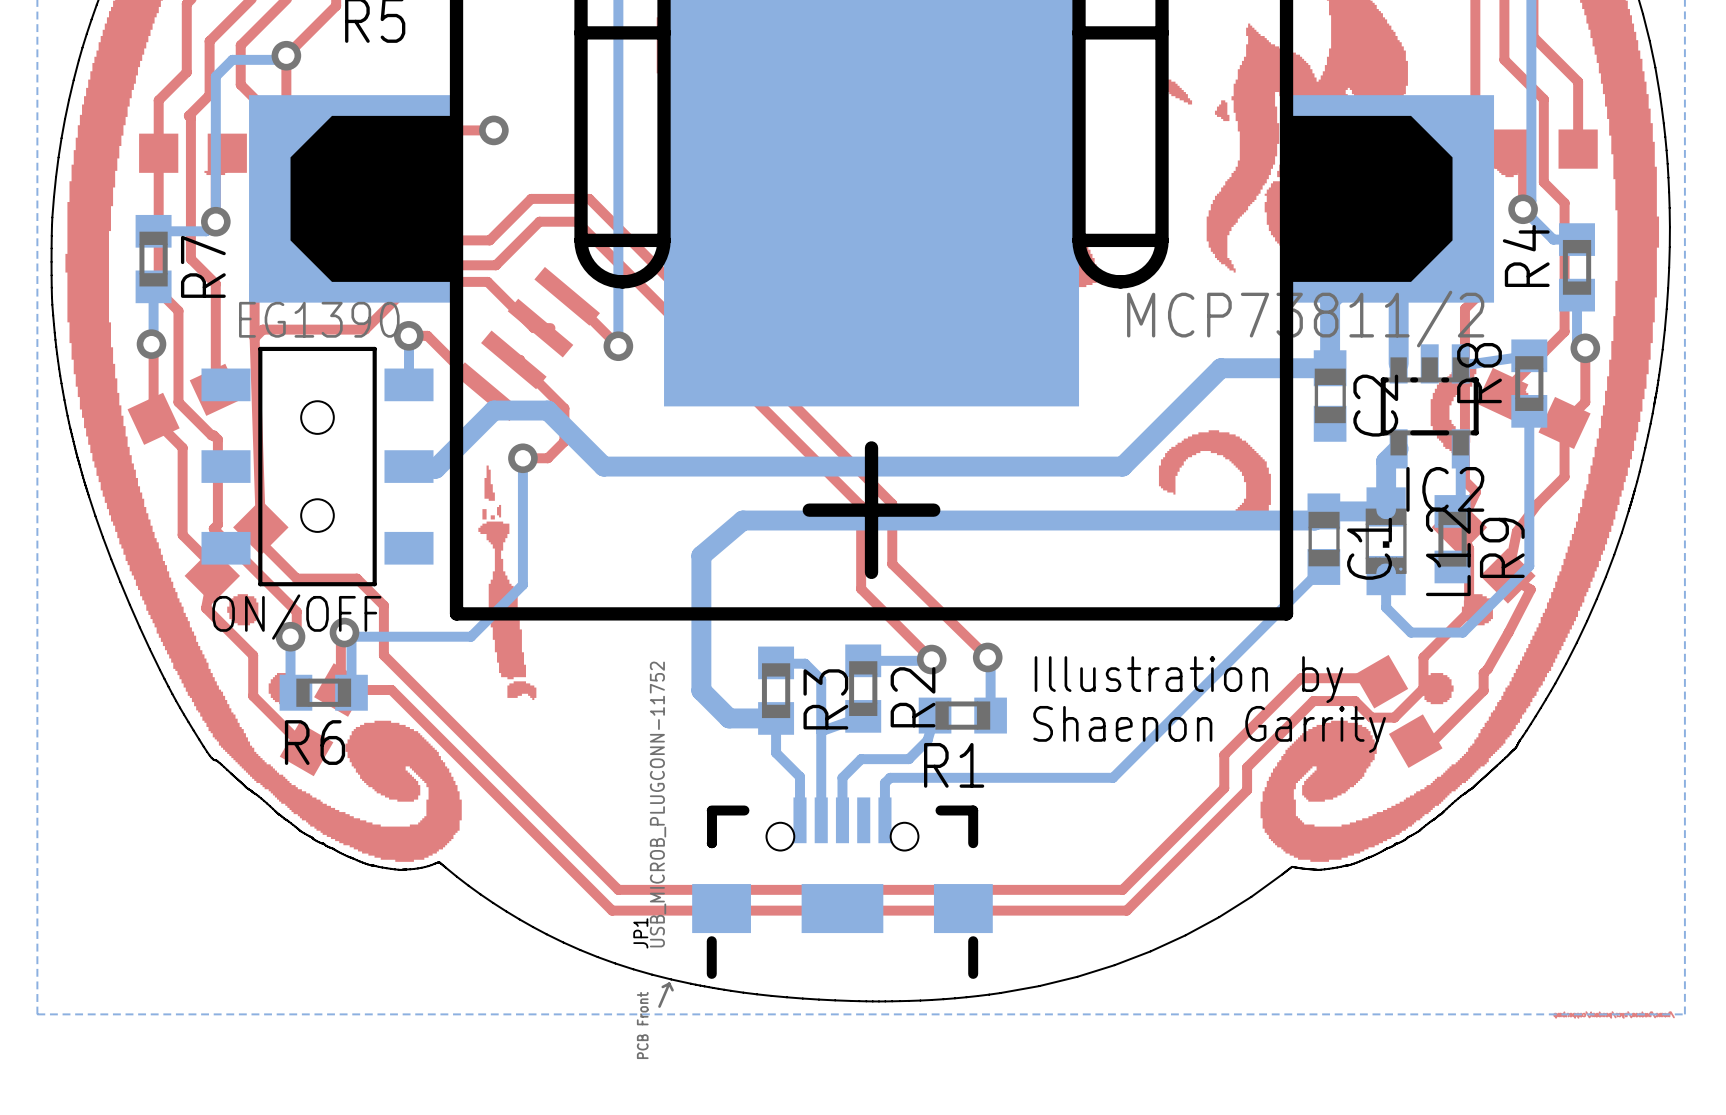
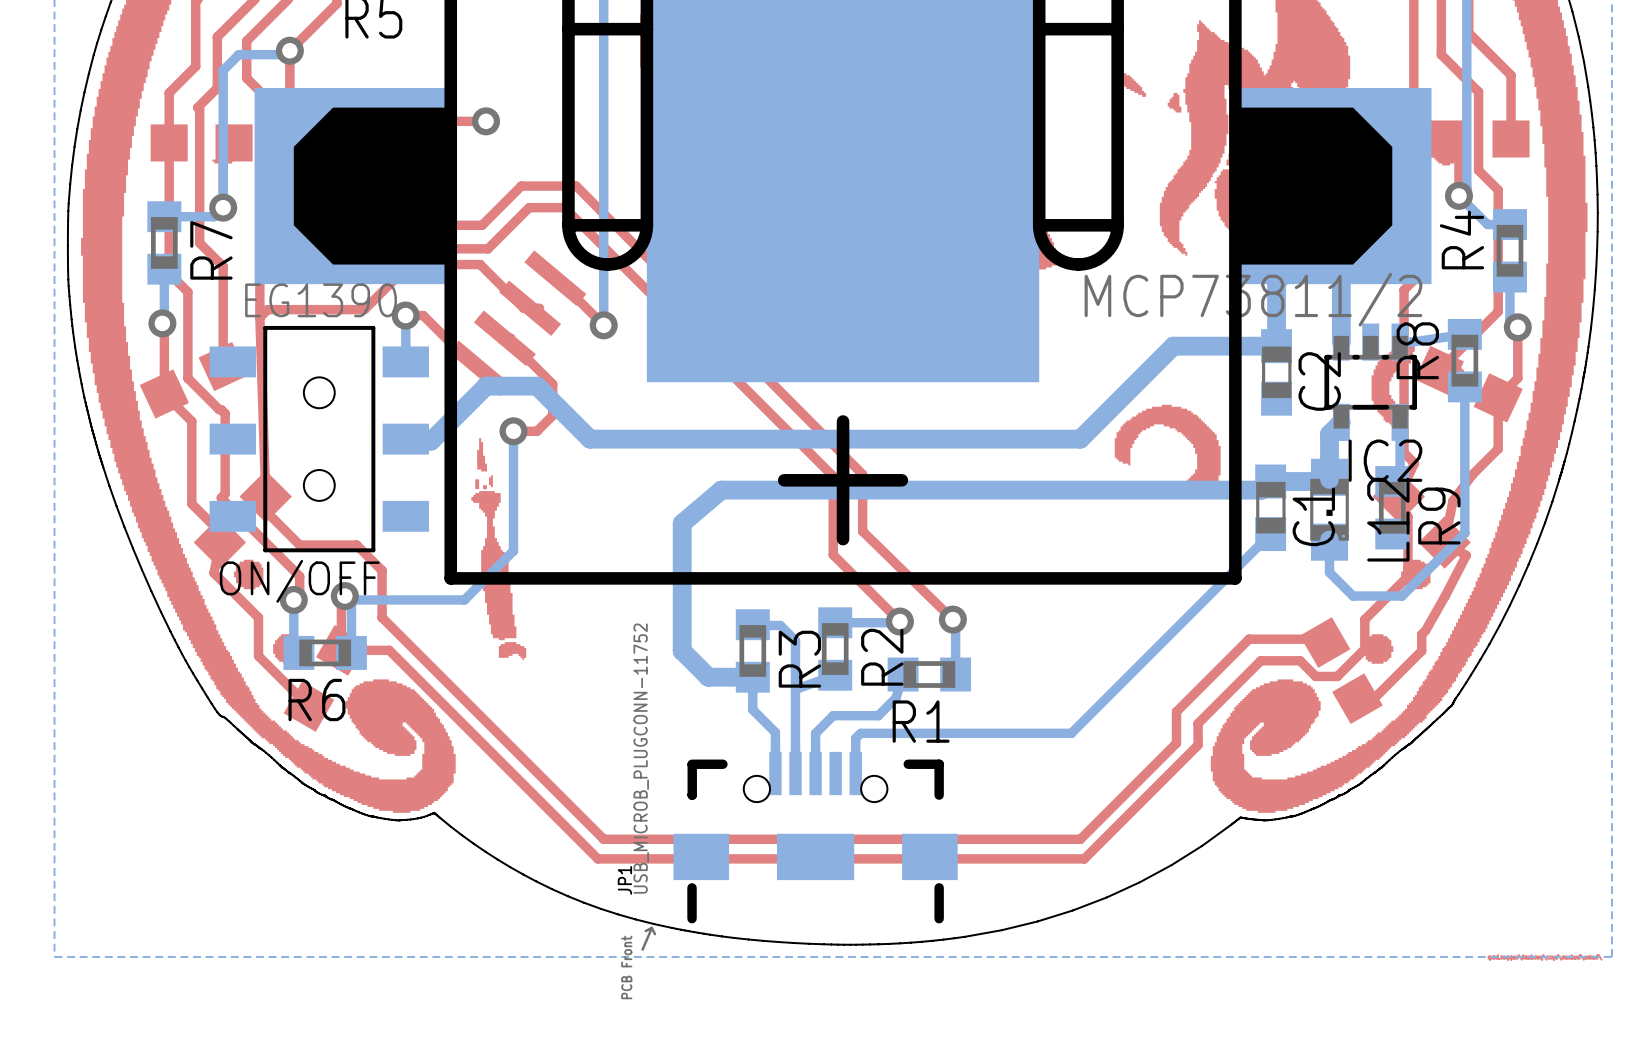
text: Illustration by (1188, 679) -> none
text: Shaenon Garrity (1209, 729) -> none

